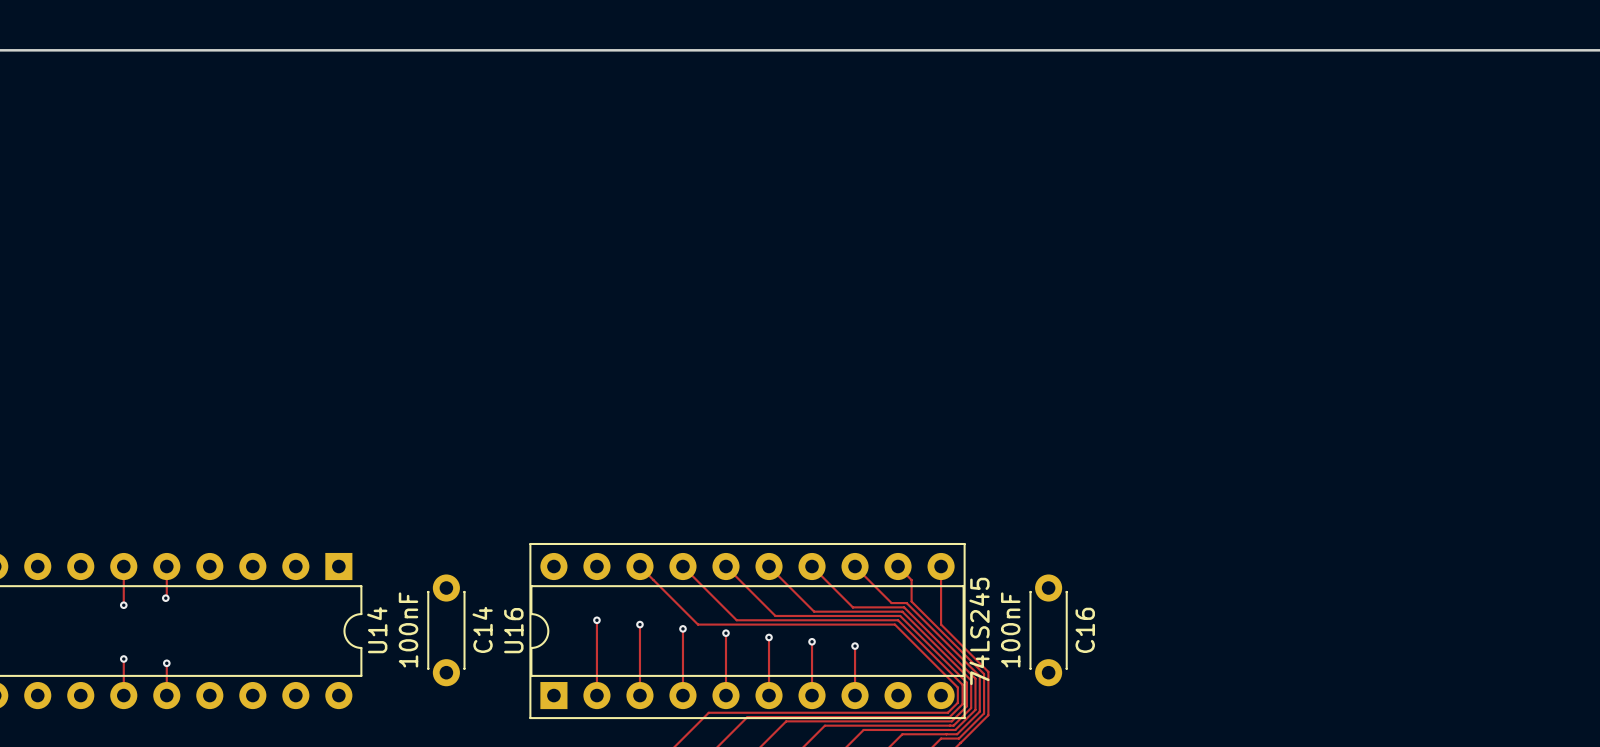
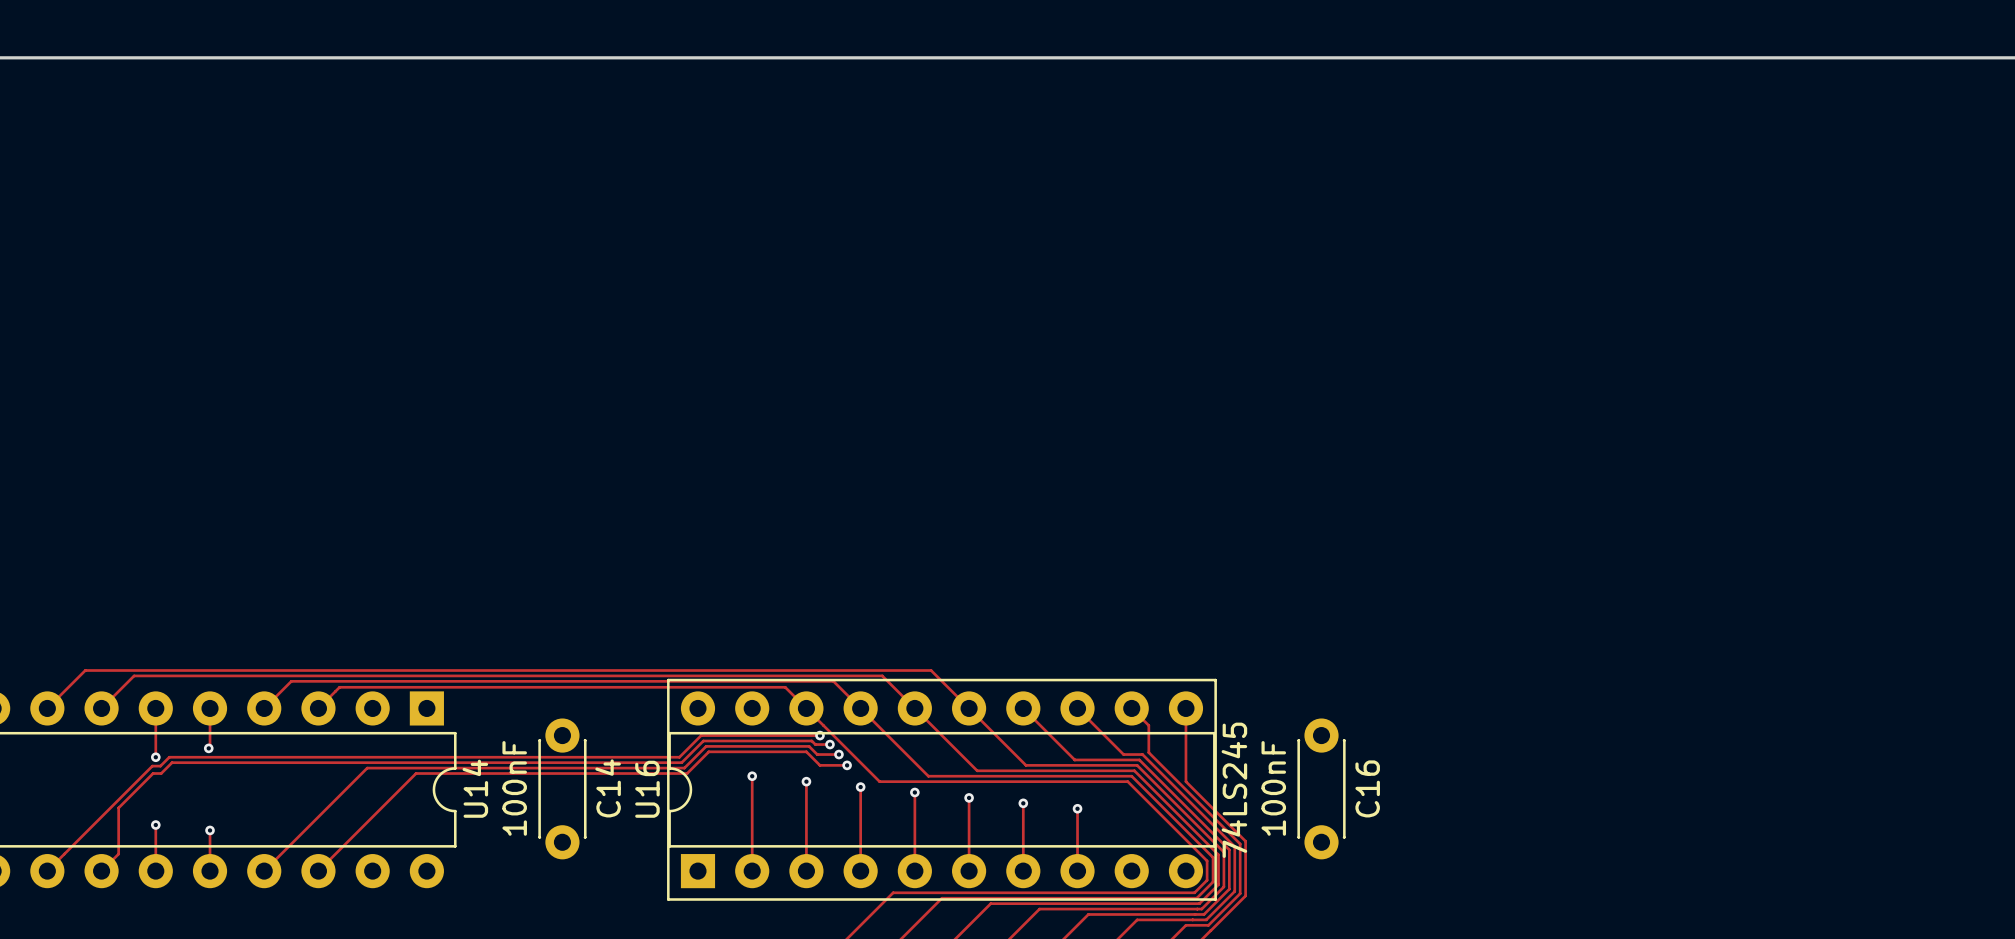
track: none -> (47, 708) (85, 670) (931, 670) (969, 708)
track: none -> (101, 708) (134, 675) (882, 675) (914, 708)
track: none -> (264, 708) (291, 681) (833, 681) (860, 708)
track: none -> (318, 708) (339, 687) (785, 687) (806, 708)
track: none -> (819, 735) (701, 735) (679, 757) (169, 757) (160, 766) (152, 766) (47, 871)
via: none -> (819, 735)
track: none -> (829, 744) (815, 744) (811, 740) (703, 740) (681, 762) (172, 762) (161, 773) (153, 773) (118, 807) (118, 854) (101, 871)
via: none -> (829, 744)
track: none -> (838, 754) (817, 754) (809, 746) (706, 746) (684, 768) (367, 768) (264, 871)
via: none -> (838, 754)
track: none -> (847, 765) (819, 765) (806, 751) (708, 751) (687, 773) (416, 773) (318, 871)
via: none -> (847, 765)

